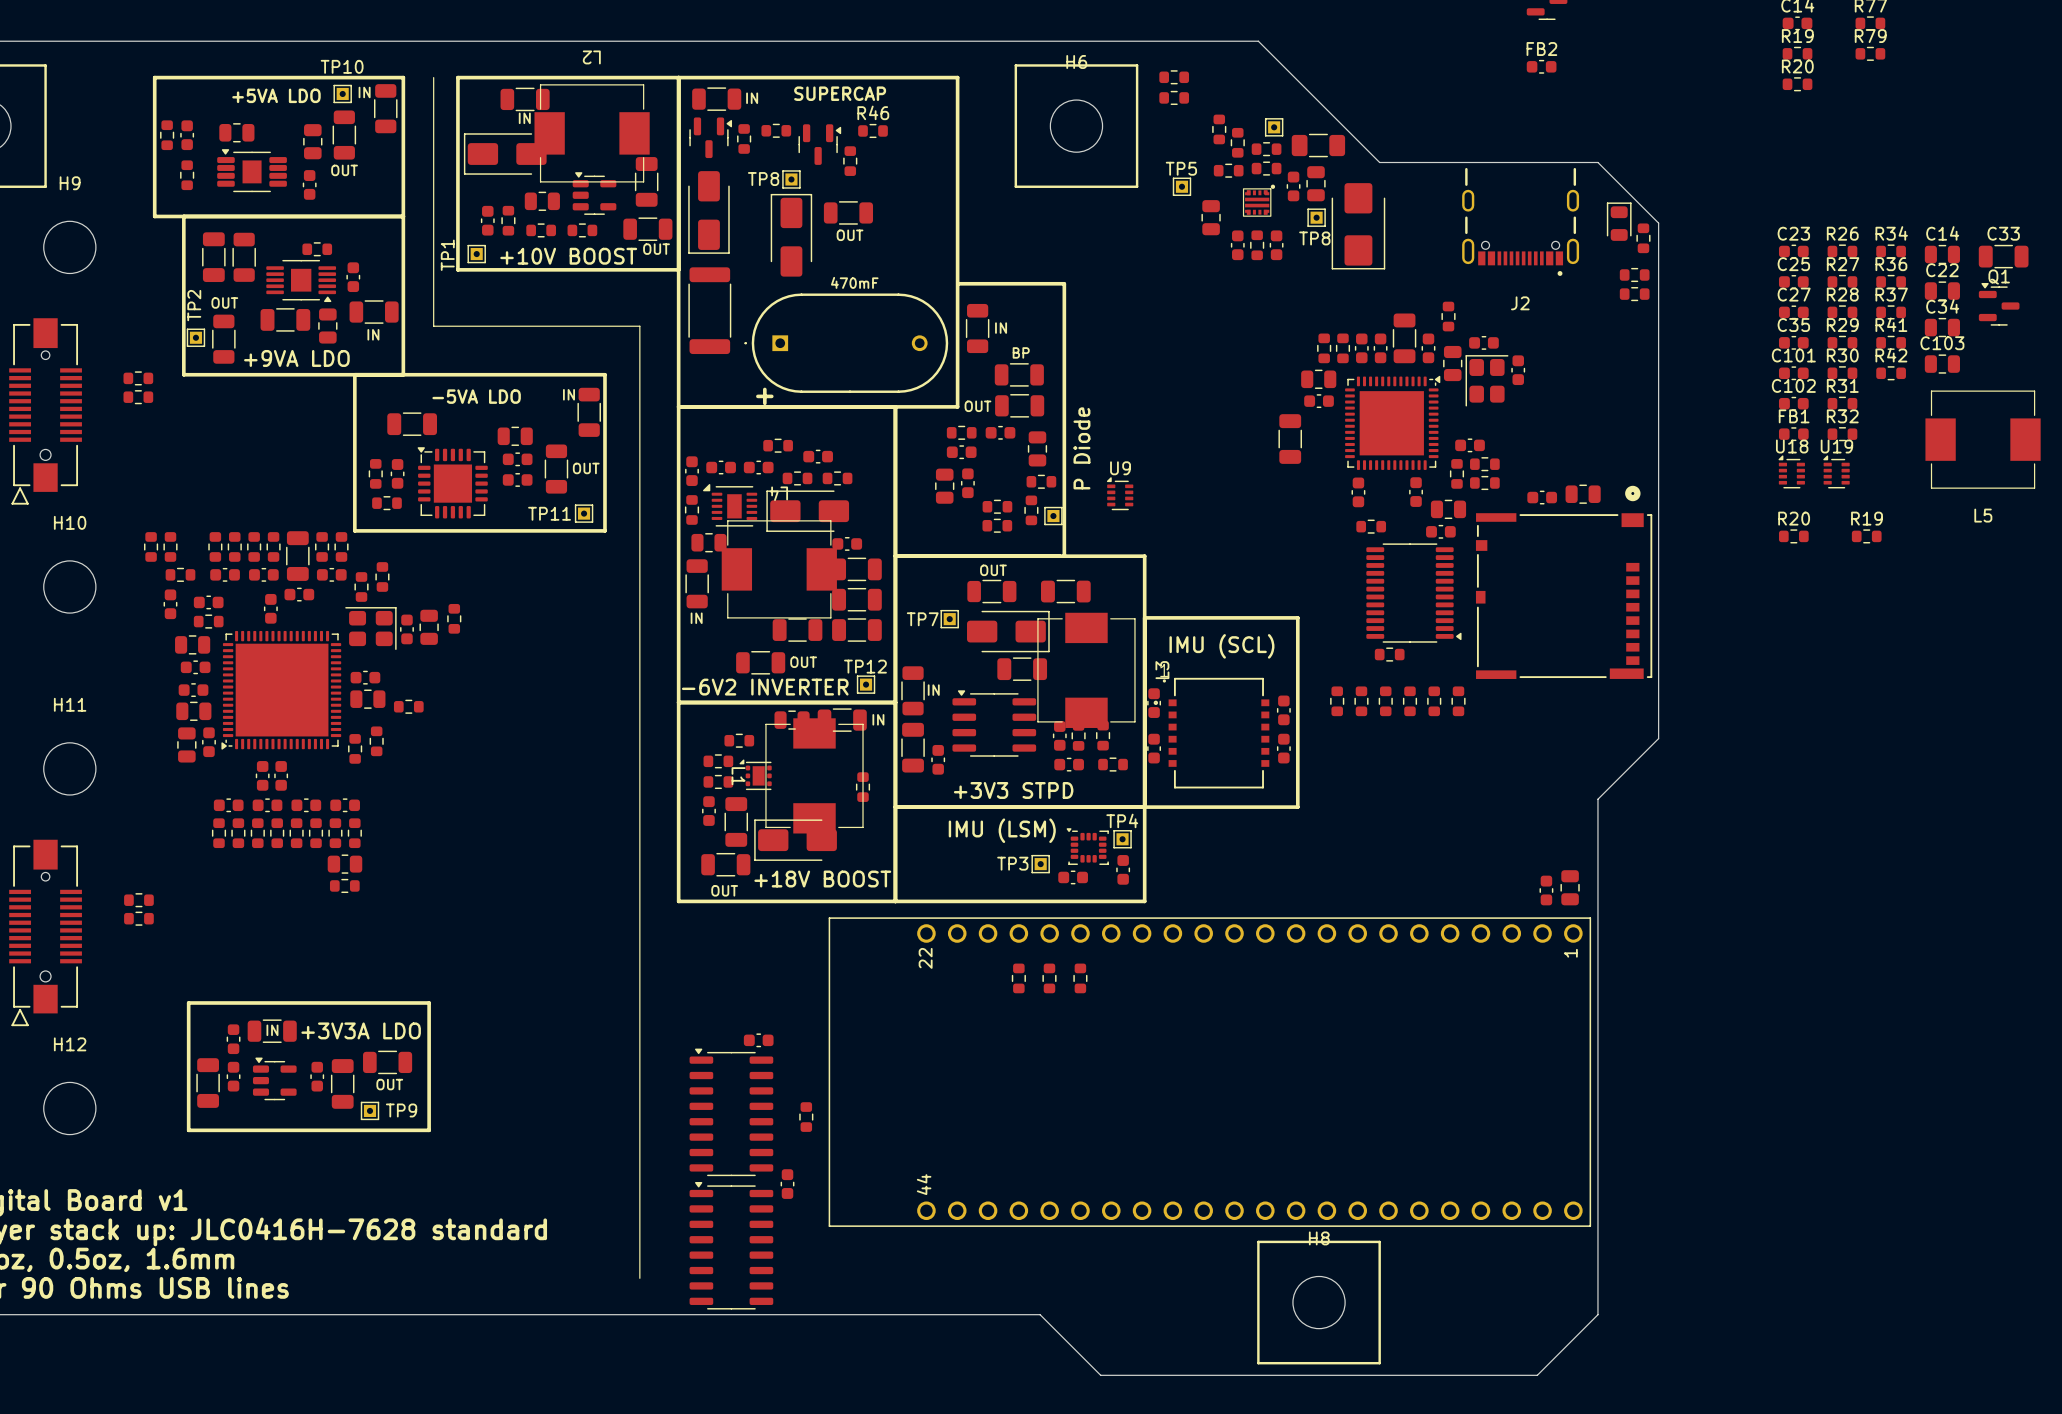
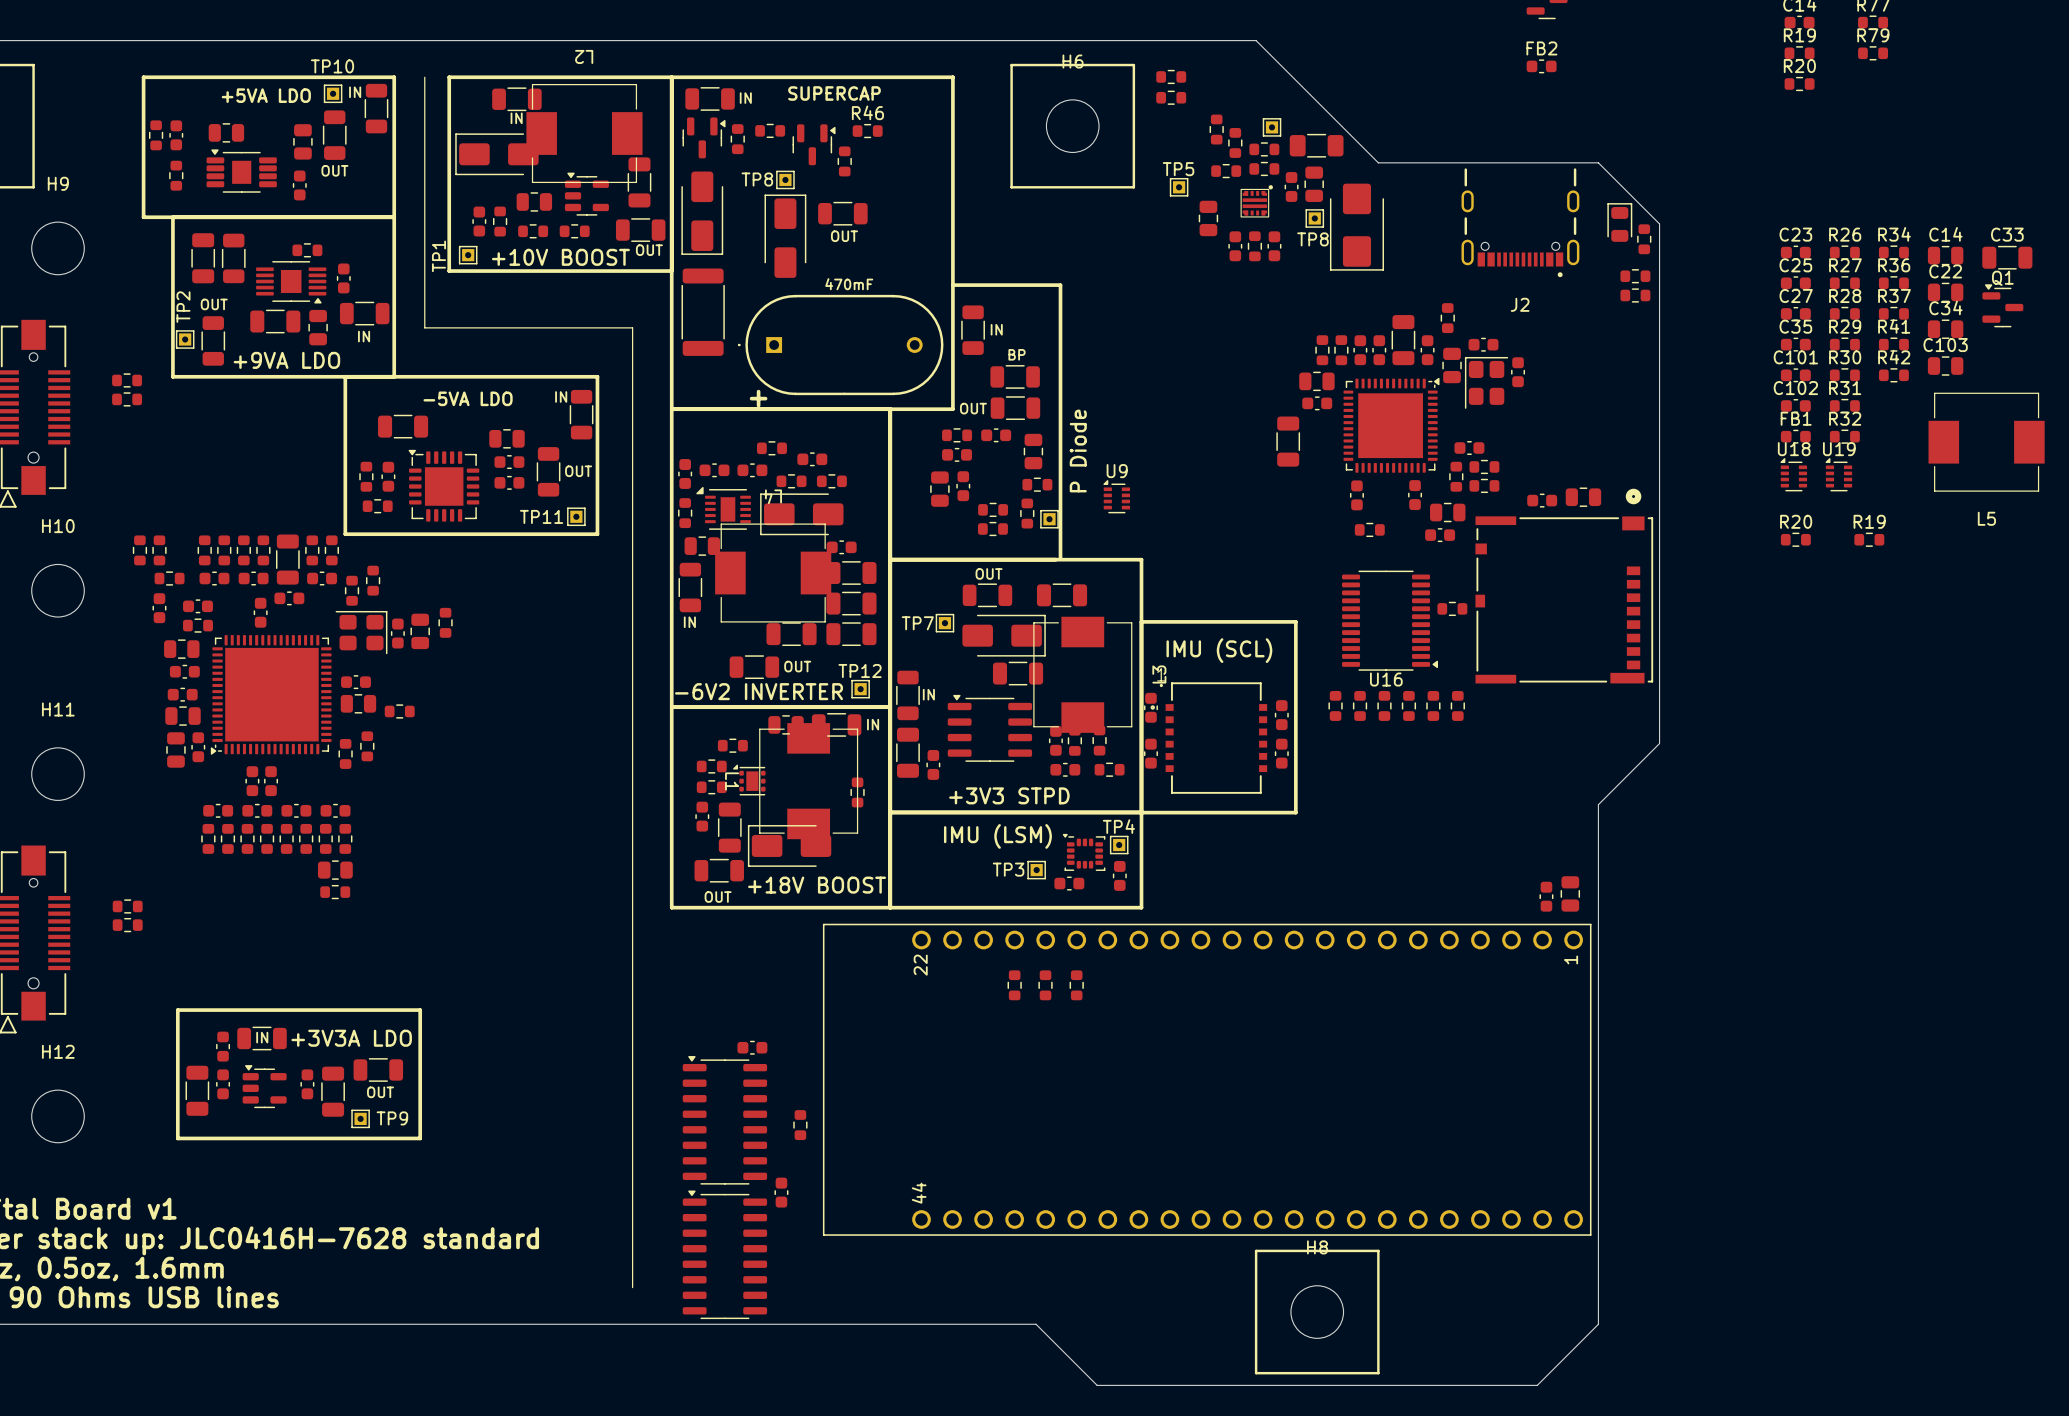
part: (1413, 593) -> none
U16: none -> (1390, 620)
part position: (1389, 654) -> (1452, 608)

